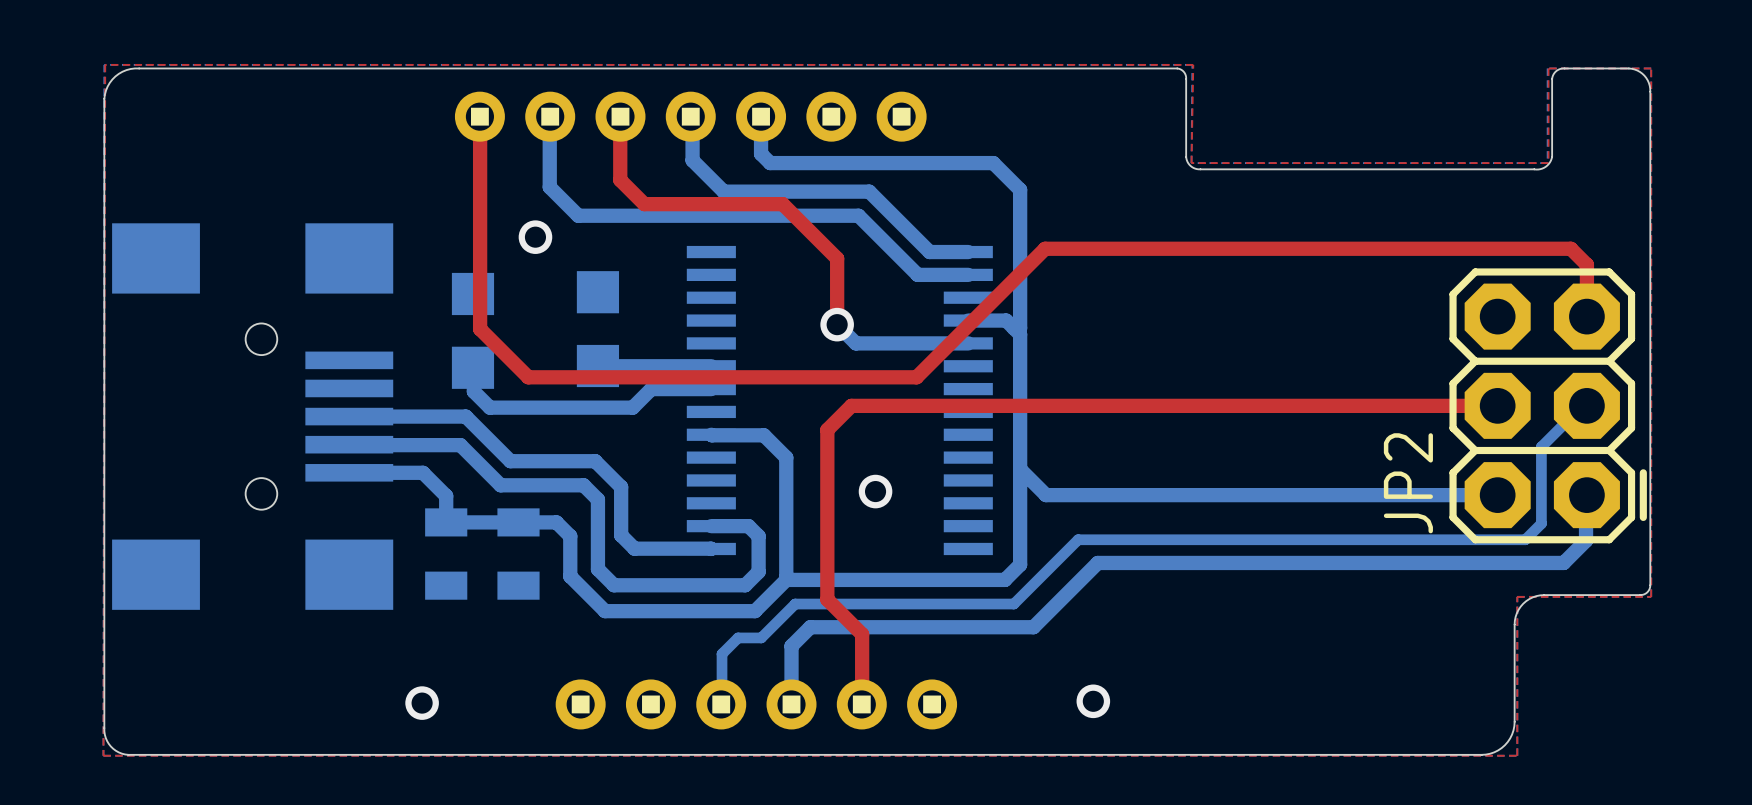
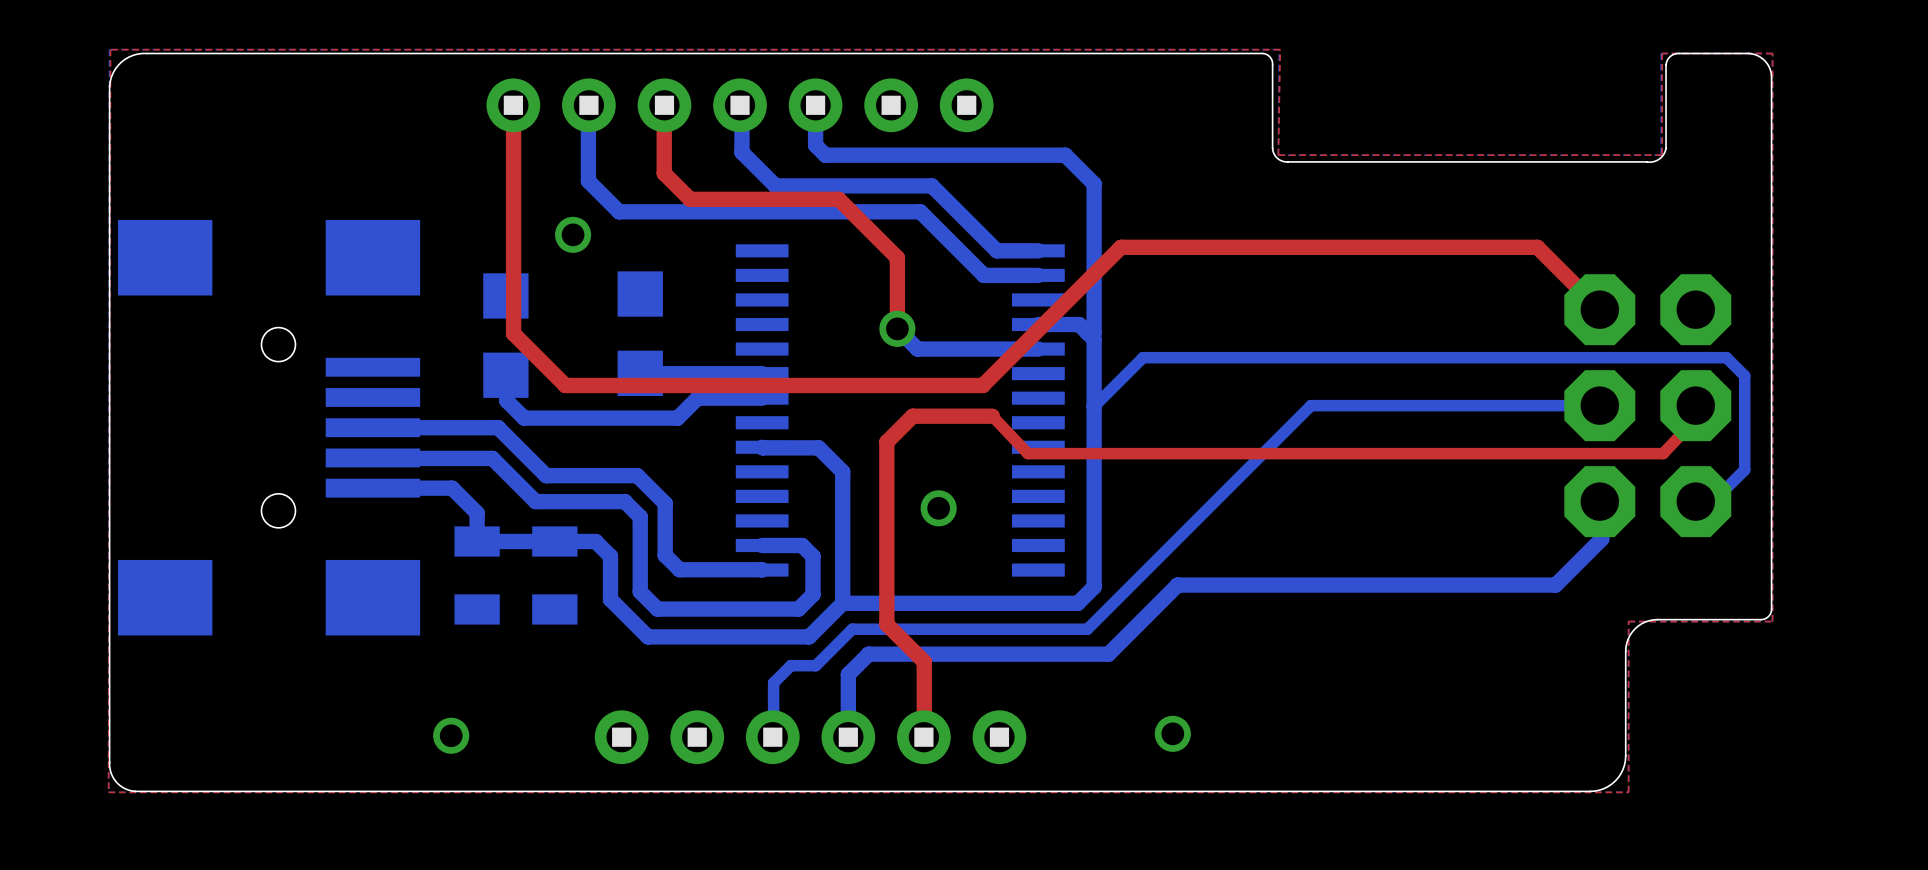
top track: (1432, 248) (1570, 248) (1586, 264) (1586, 316) -> (1537, 247) (1599, 309)
bottom track: none -> (1094, 406) (1143, 357) (1726, 357) (1744, 375) (1744, 469) (1713, 501) (1695, 501)
top track: (925, 405) (1497, 405) -> (992, 416) (1027, 453) (1663, 453) (1695, 419) (1695, 405)
JP2 side: top (1548, 405) -> bottom (1647, 405)
bottom track: (1586, 405) (1582, 405) (1541, 446) (1541, 523) (1525, 539) (1078, 539) -> (1599, 405) (1310, 405) (1156, 560)
bottom track: (1020, 469) (1046, 495) (1497, 495) -> none
bottom track: (1586, 495) (1586, 540) (1563, 562) (1449, 562) -> (1599, 501) (1601, 503) (1601, 539) (1555, 585)

